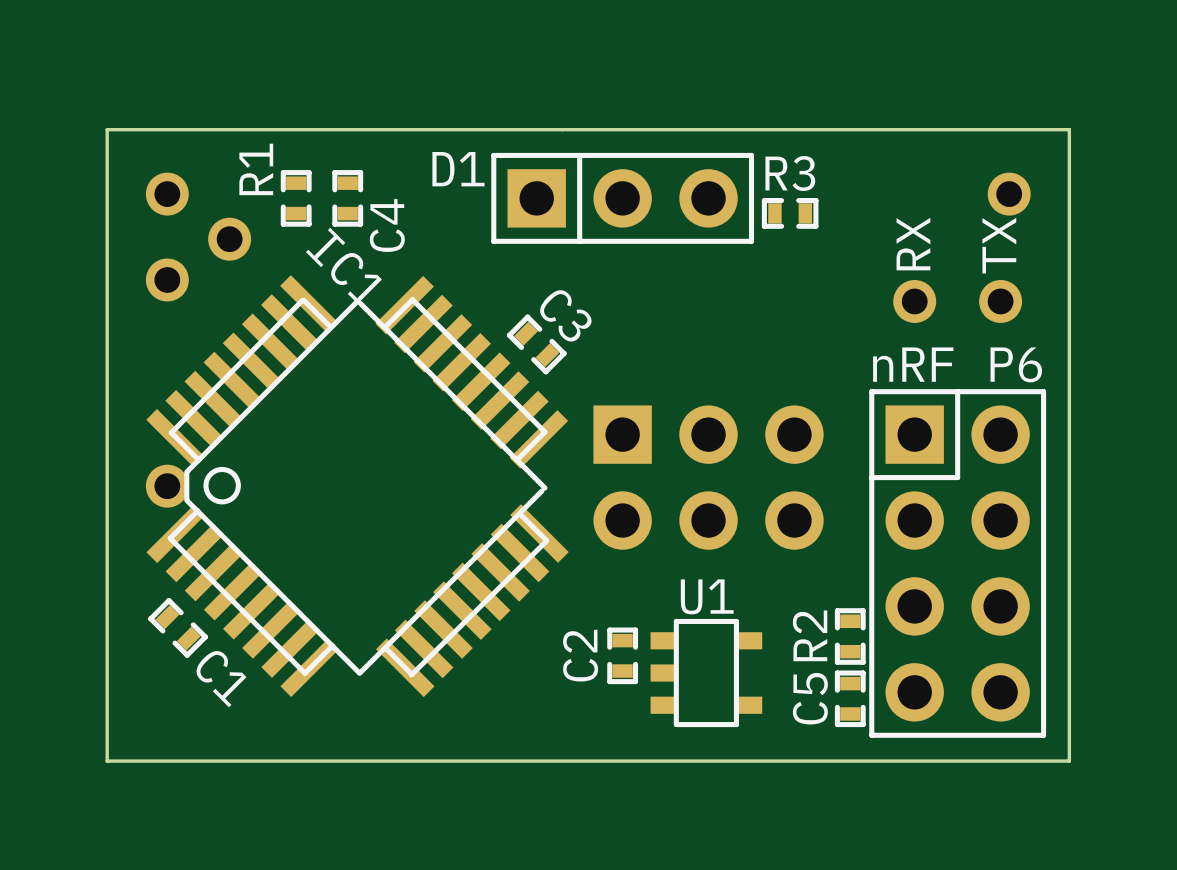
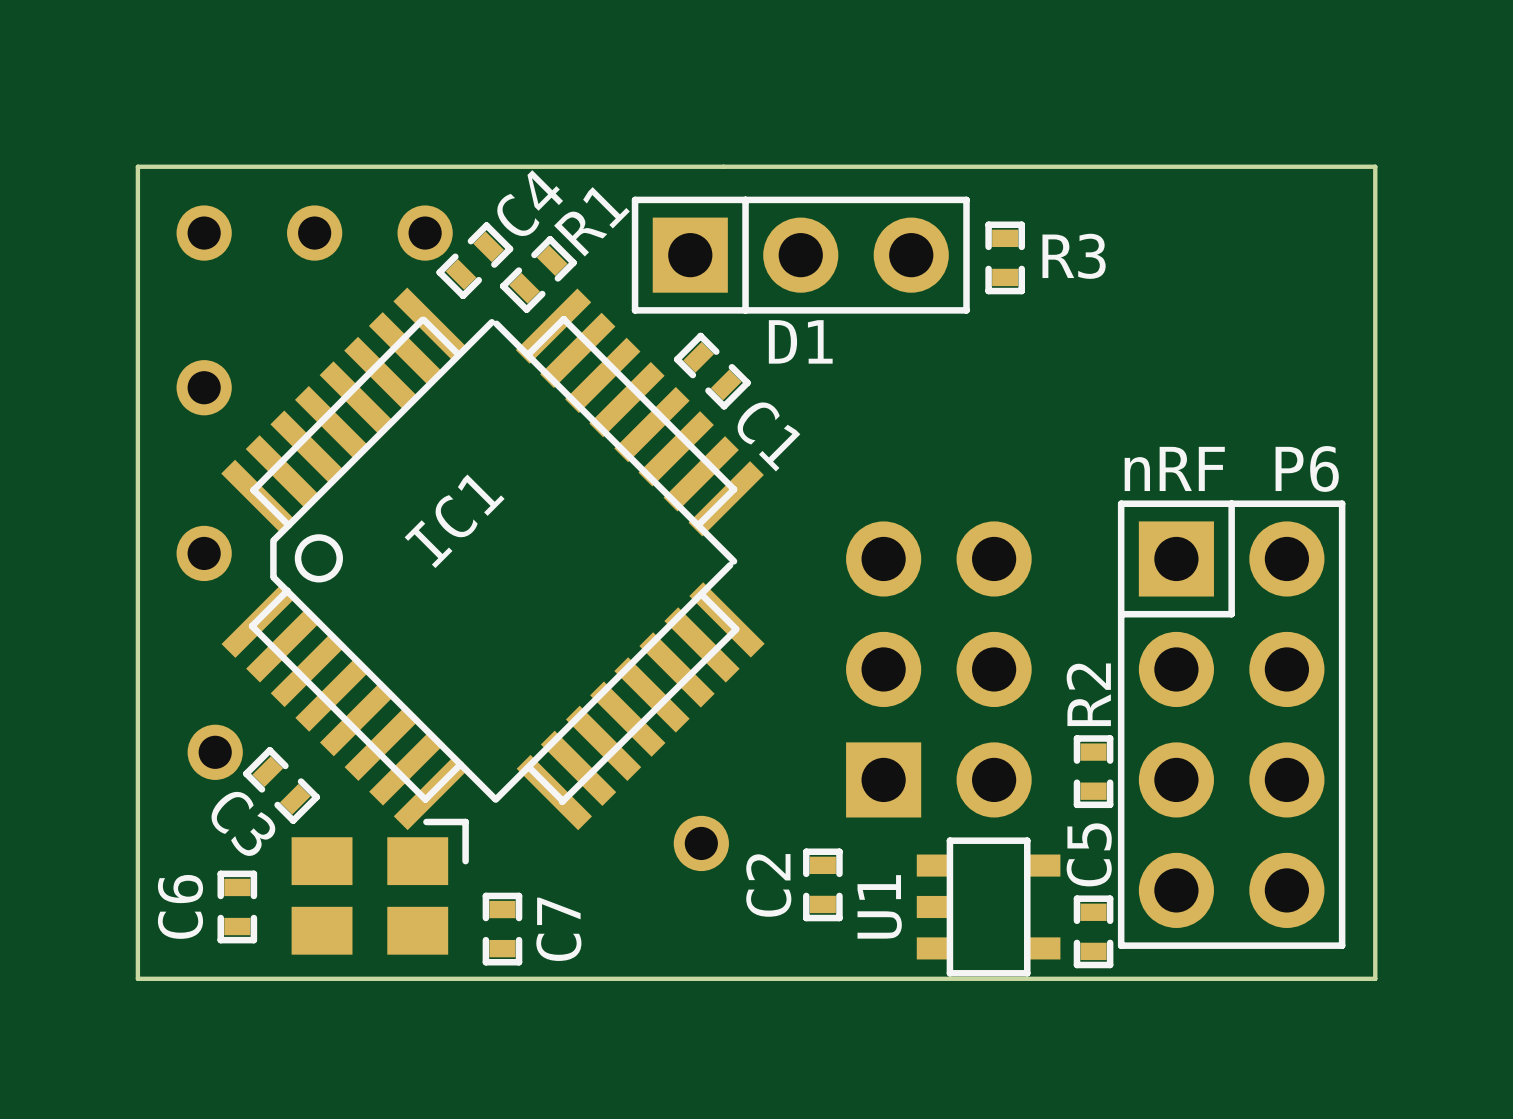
D1 name position: D1 (458, 169) -> D1 (800, 341)
part: none -> (425, 233)
part position: (167, 194) -> (204, 233)
part: (1009, 194) -> none
R1 rotation: 0° (296, 198) -> 45° clockwise (538, 274)
R1 position: (296, 198) -> (538, 274)
C4 rotation: 0° (347, 198) -> 45° clockwise (474, 260)
R3 rotation: 0° (790, 213) -> 90° clockwise (1005, 257)
C4 name position: C4 (387, 225) -> C4 (529, 203)
part: (229, 239) -> none
IC1 name rotation: 0° (343, 268) -> 90° counterclockwise (454, 521)
IC1 name position: IC1 (343, 268) -> IC1 (454, 521)
part position: (167, 279) -> (204, 387)
part position: (914, 301) -> (314, 233)
part: TX (1000, 301) -> none
C3 name position: C3 (565, 315) -> C3 (243, 823)
C3 position: (536, 344) -> (281, 785)
part: none -> (204, 553)
part rotation: 0° (708, 477) -> 90° counterclockwise (938, 669)
part: (167, 486) -> none
IC1 position: (357, 486) -> (492, 558)
part: none -> (215, 752)
U1 name rotation: 0° (707, 596) -> 90° counterclockwise (879, 906)
U1 name position: U1 (707, 596) -> U1 (879, 906)
C1 position: (178, 627) -> (712, 371)
R2 name position: R2 (810, 635) -> R2 (1088, 694)
R2 position: (850, 636) -> (1093, 771)
part: none -> (701, 843)
C2 position: (622, 655) -> (822, 884)
U1 position: (706, 673) -> (988, 906)
part: none -> (380, 886)
C5 name position: C5 (810, 698) -> C5 (1089, 854)
C5 position: (850, 698) -> (1093, 931)
C6: none -> (237, 906)
C7: none -> (502, 929)

